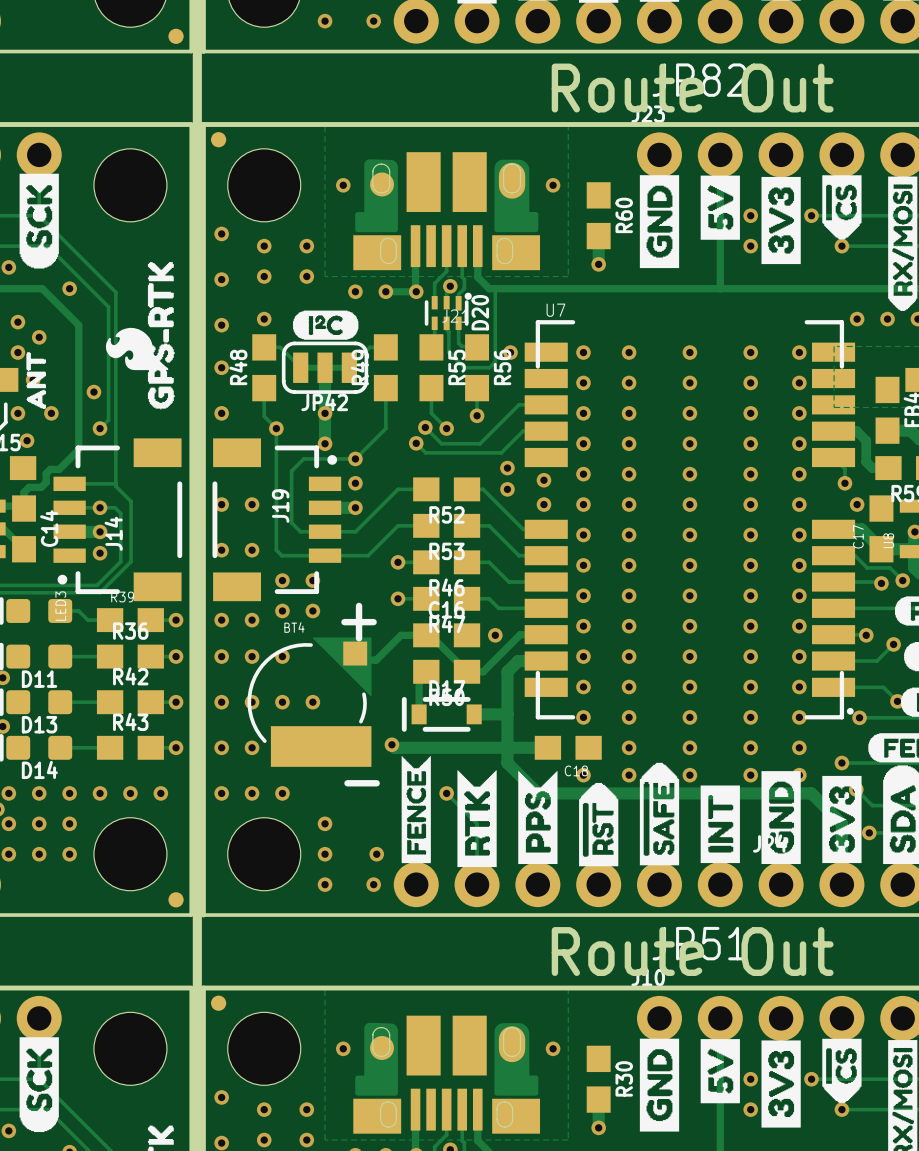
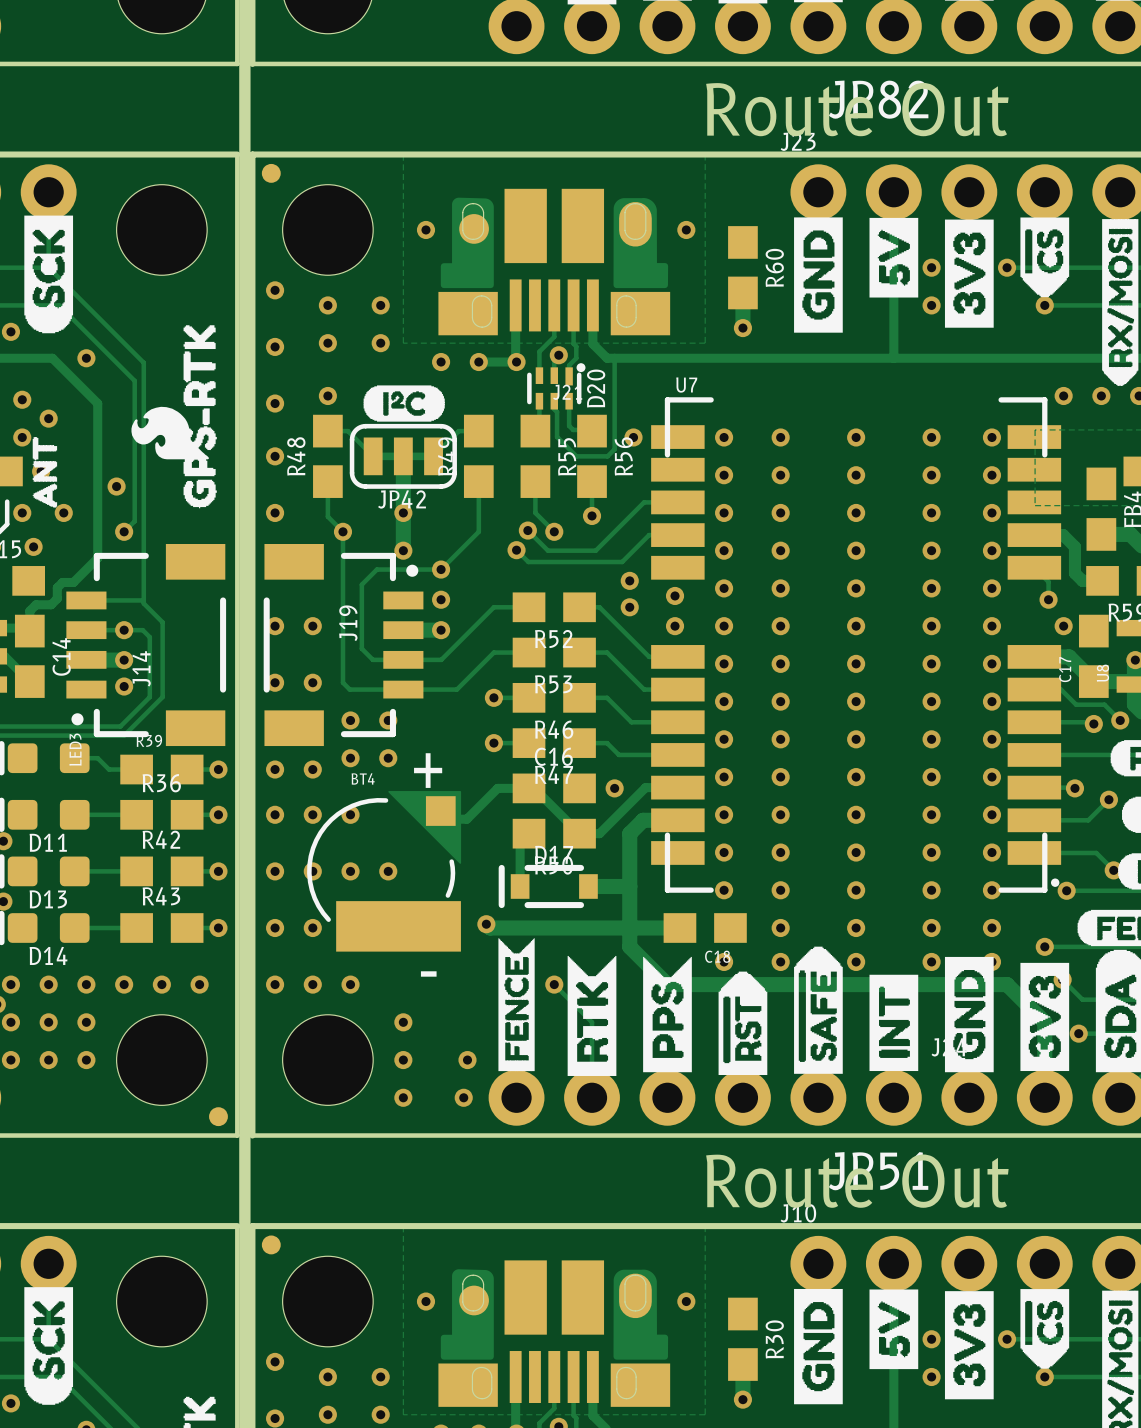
via: (325, 21) -> none
via: (373, 21) -> none
part: (176, 36) -> none

